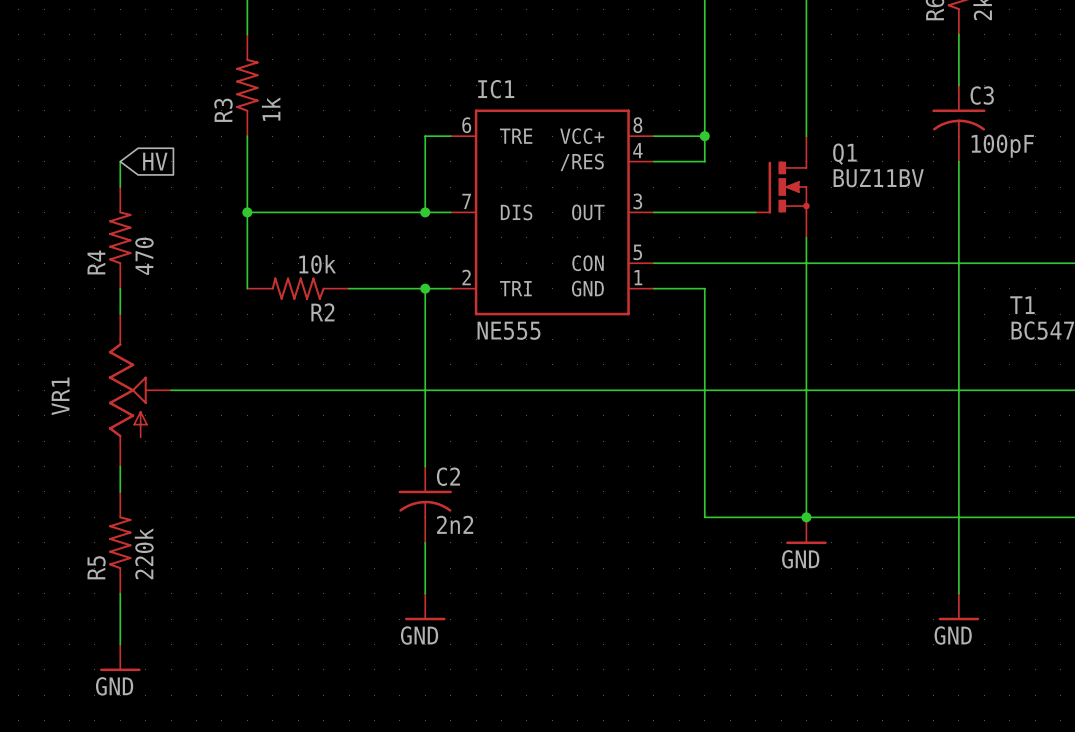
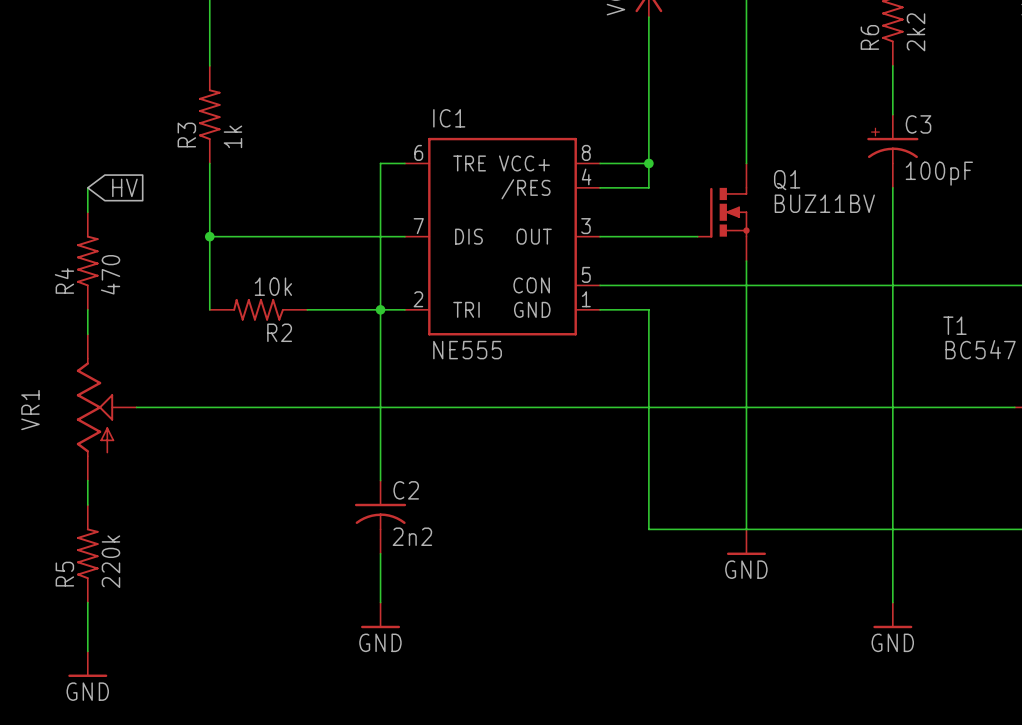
C3 symbol: [932, 85, 986, 162] -> [867, 114, 919, 188]
wire: none -> (380, 236) (380, 309)
junction: (425, 212) -> none
junction: (806, 517) -> none

